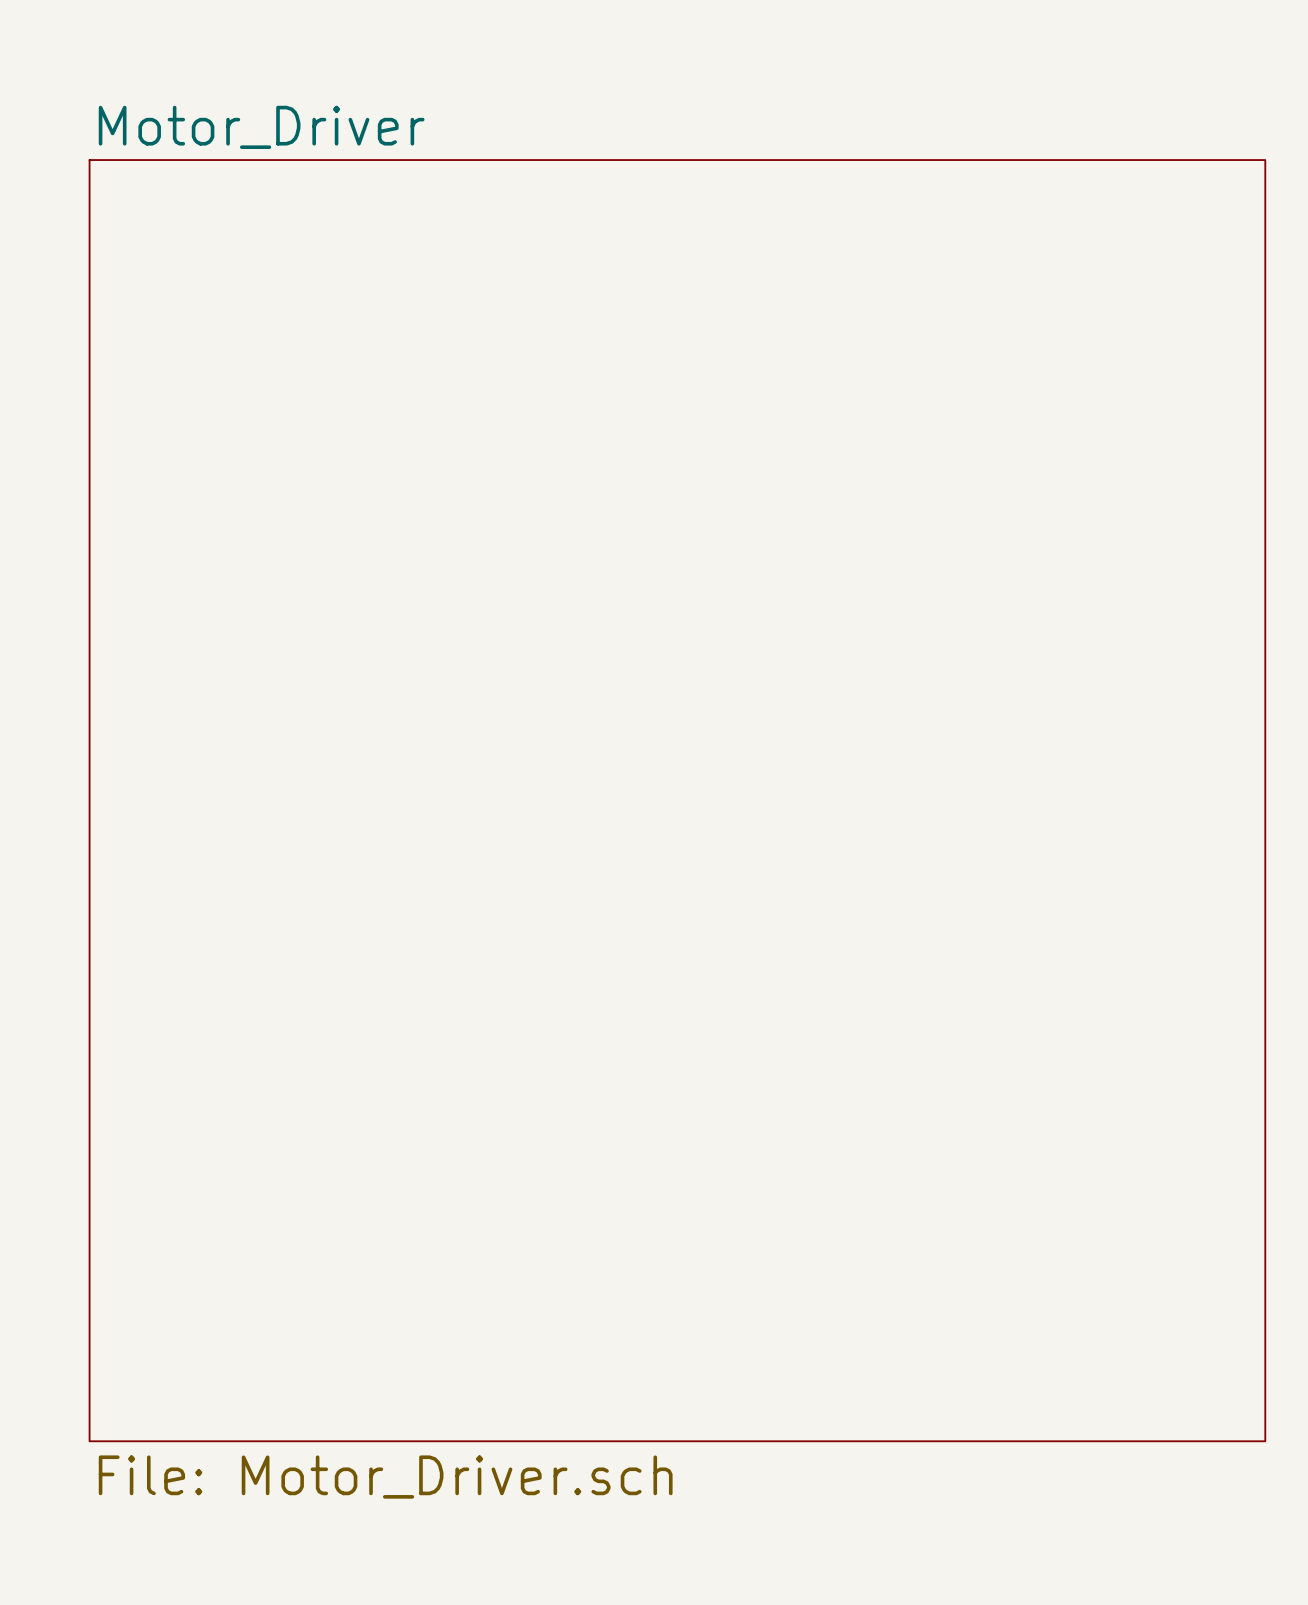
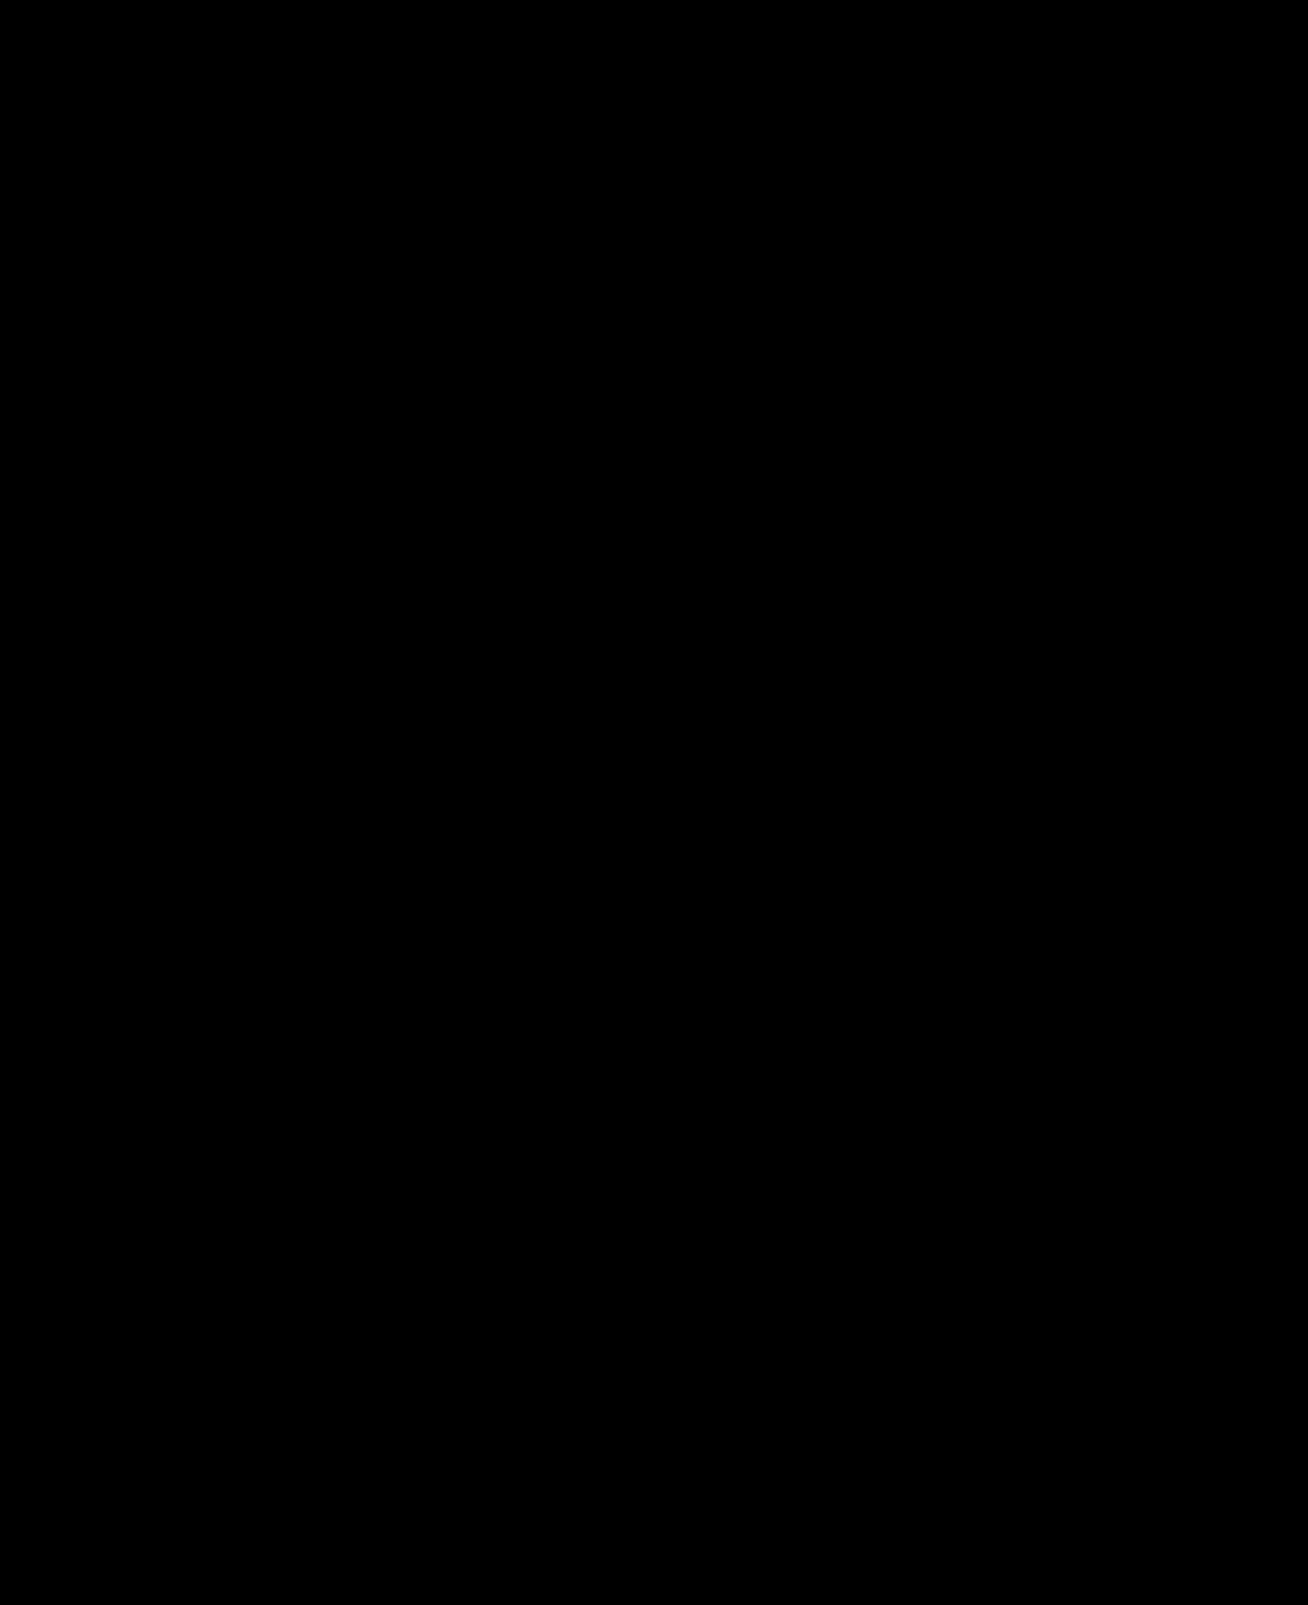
sheet Motor_Driver: File: Motor_Driver.sch (677, 800) -> none

